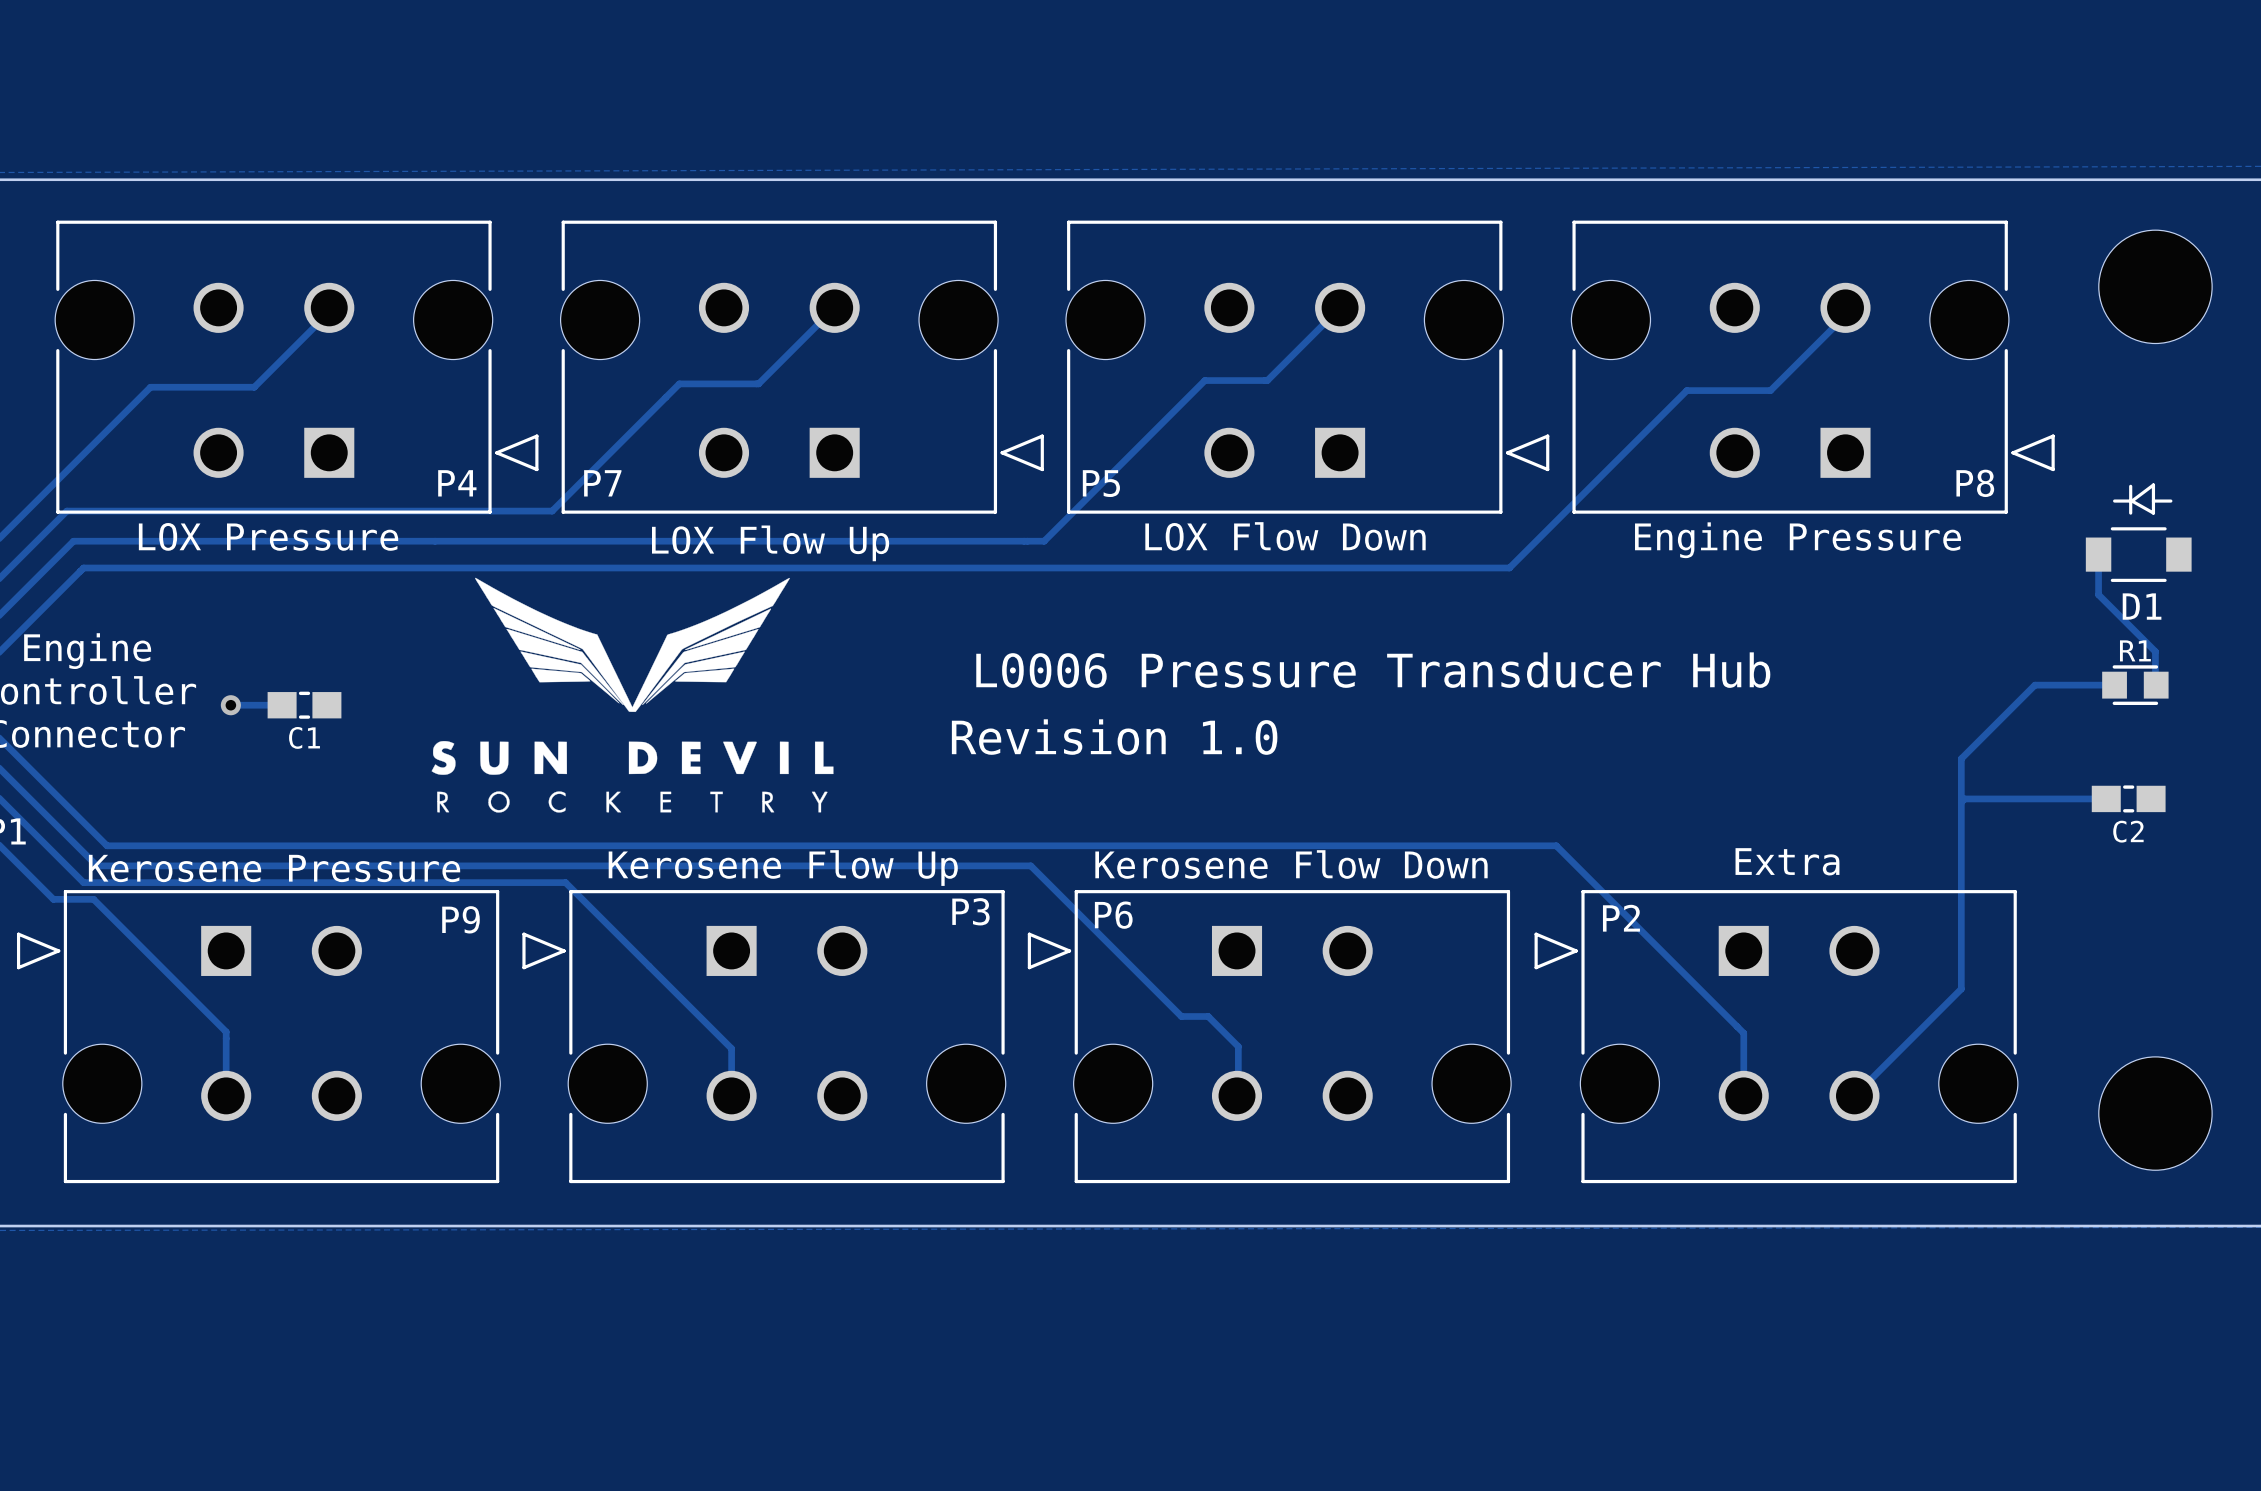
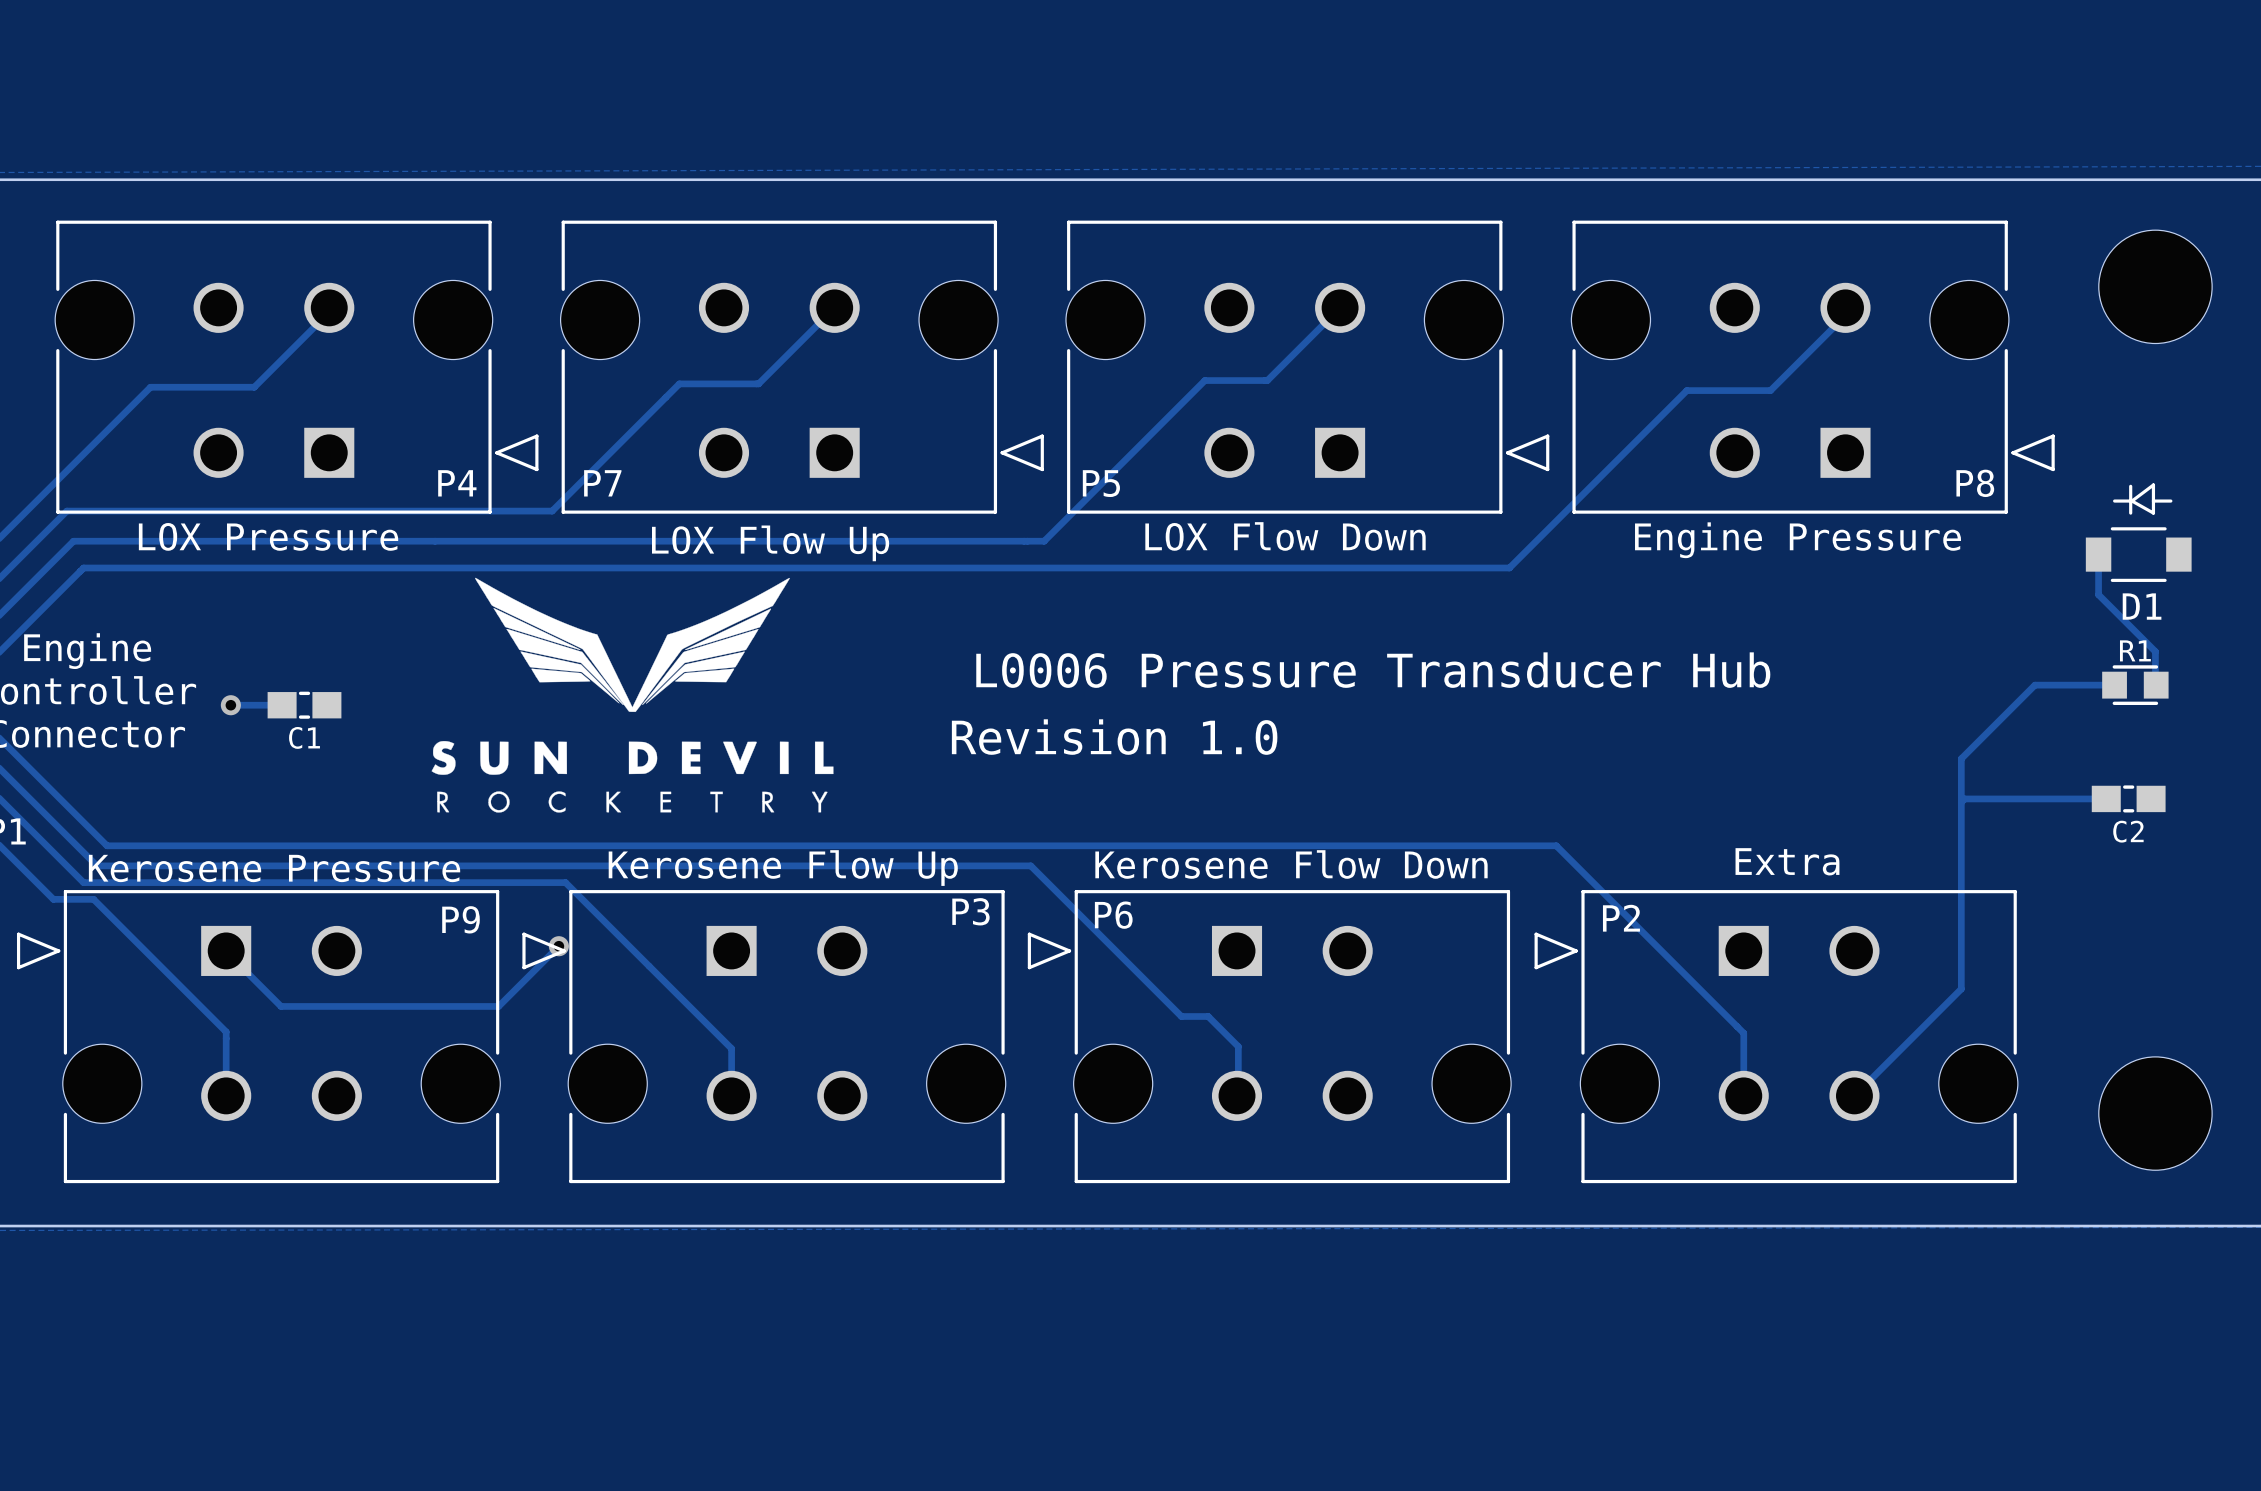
track: none -> (558, 946) (498, 1006) (281, 1006) (226, 950)
via: none -> (558, 946)

